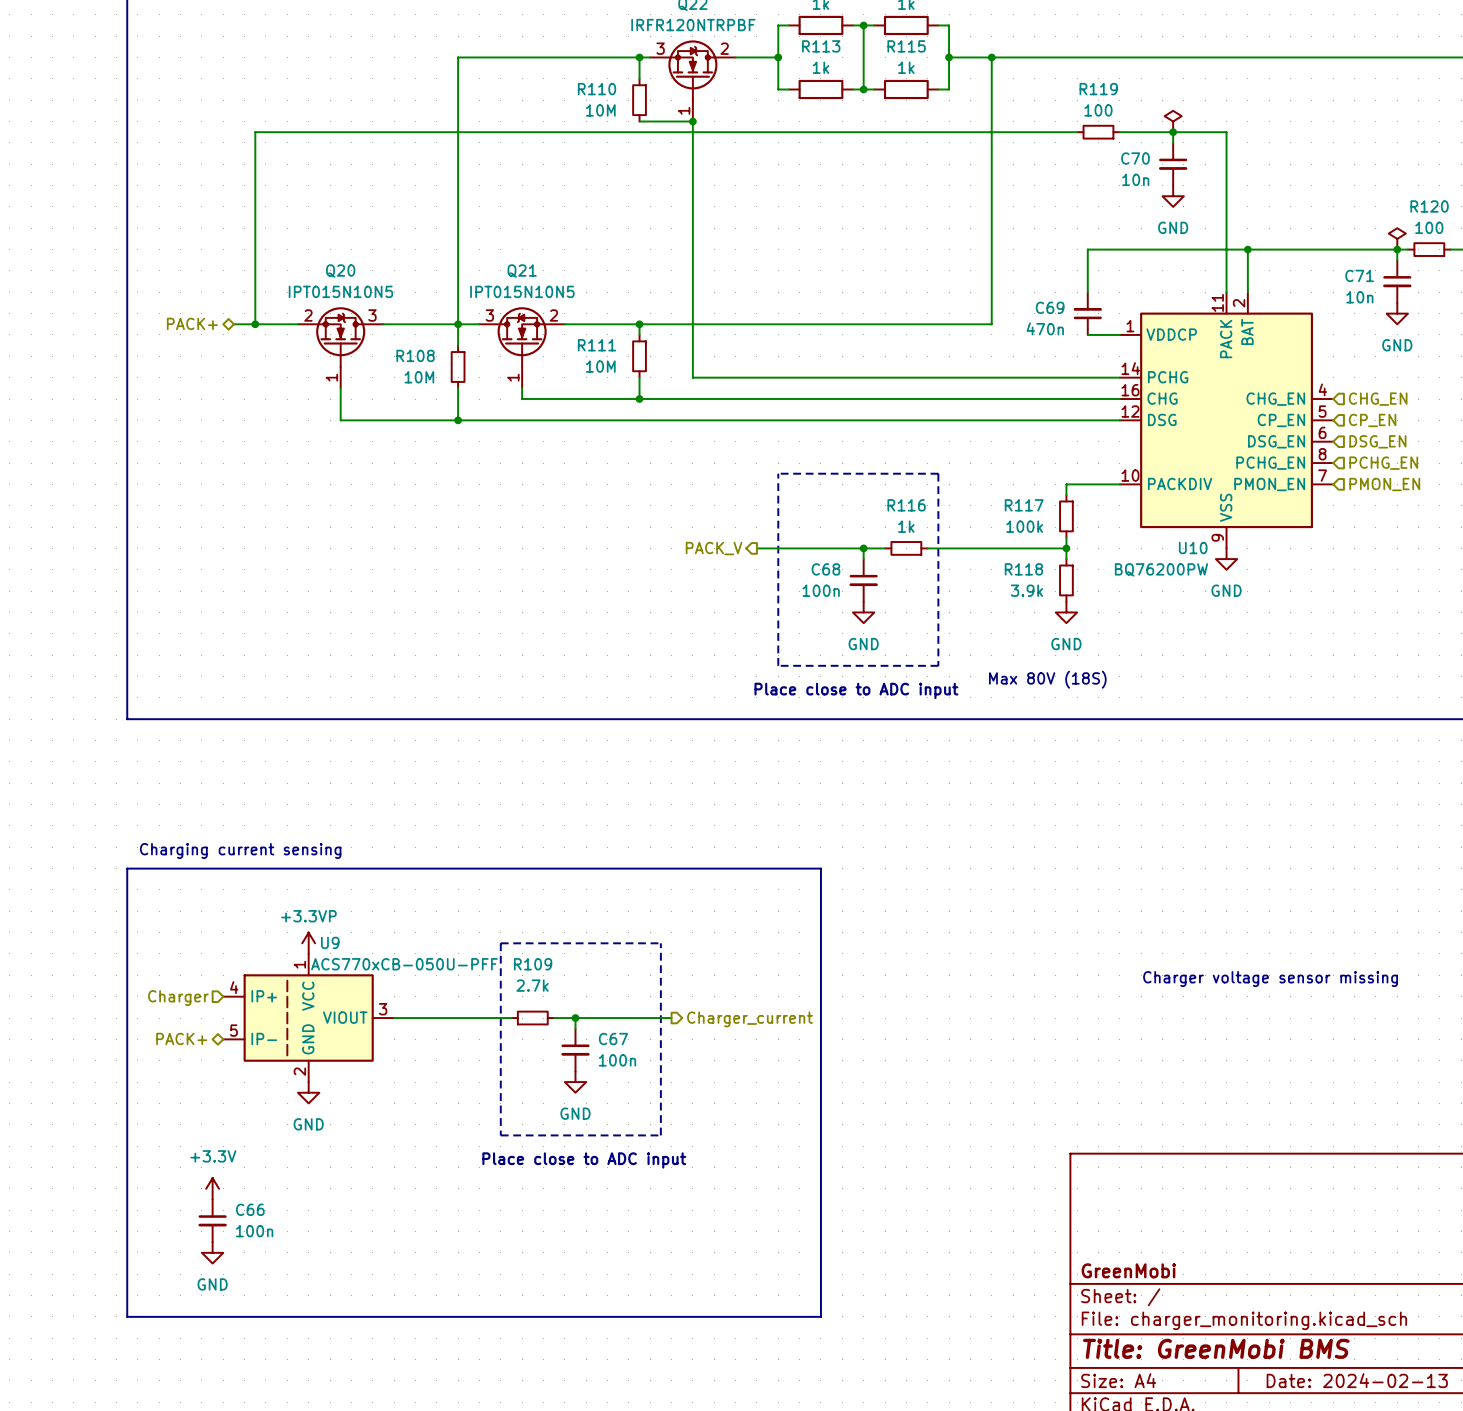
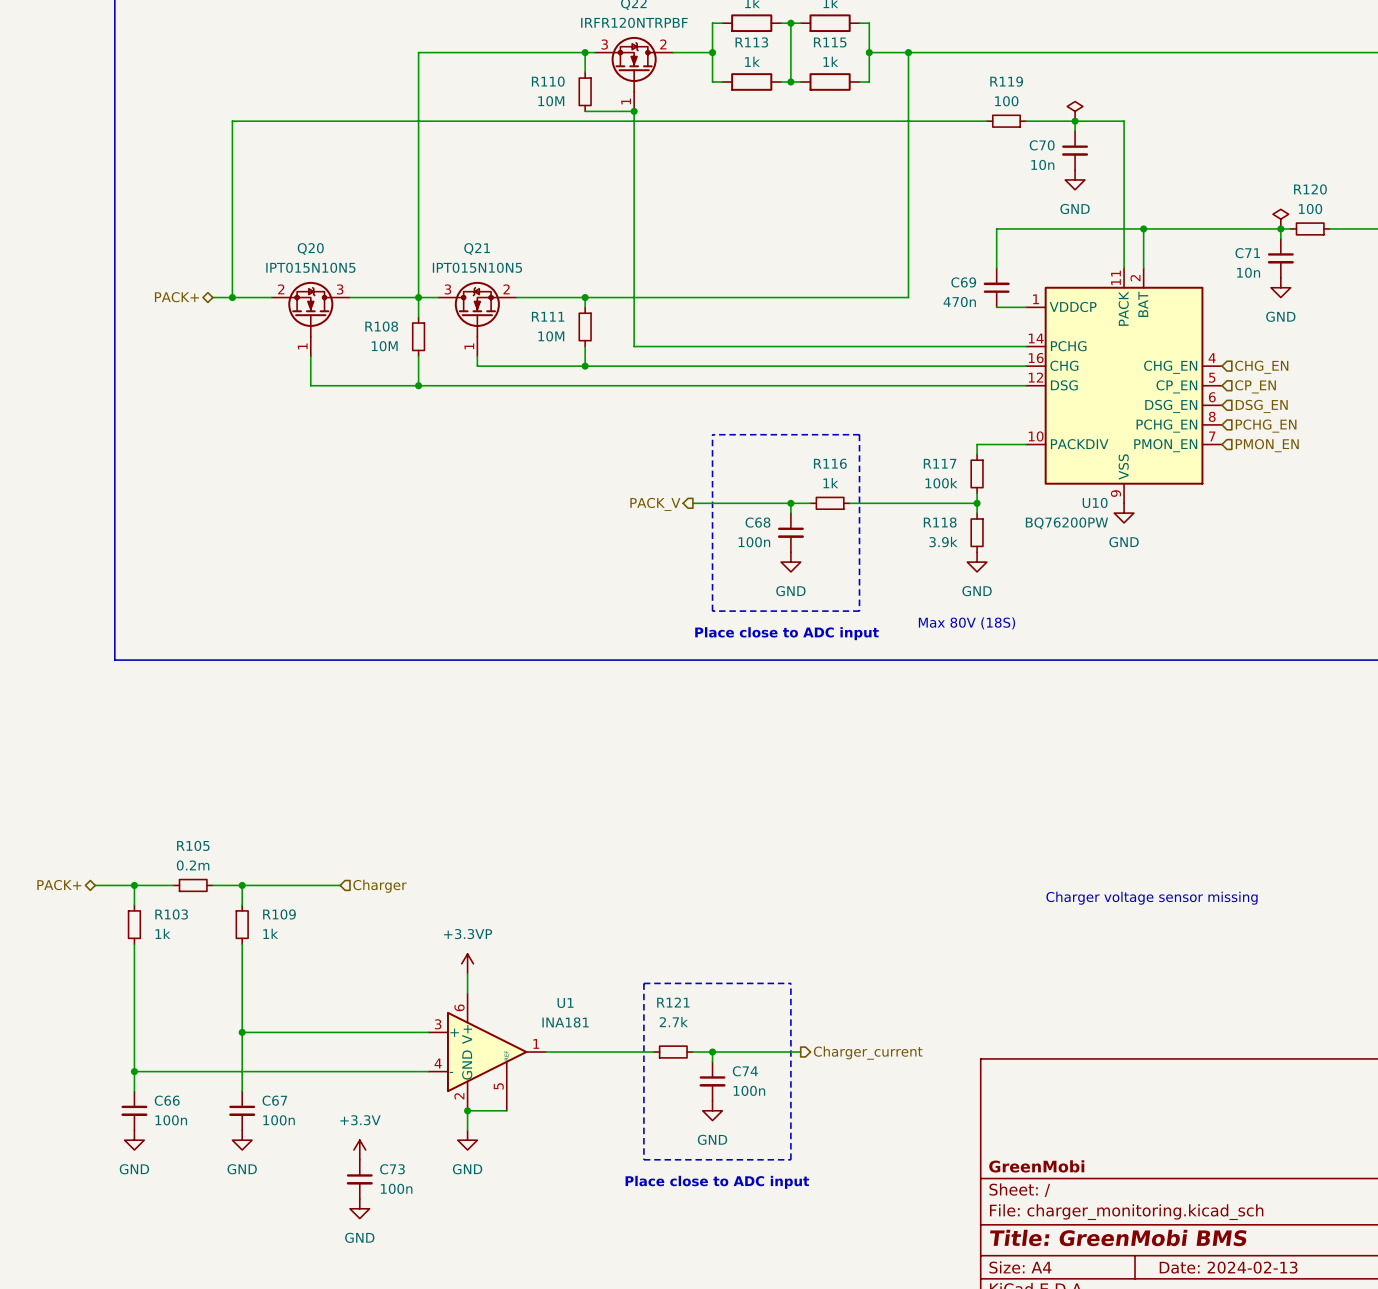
text: Charging current sensing (240, 850) -> none
line: (127, 868) (820, 868) (820, 1316) (127, 1316) (127, 868) -> none
power symbol: +3.3VP (308, 943) -> none
line: (500, 943) (660, 943) (660, 1135) (500, 1135) (500, 943) -> none
wire: none -> (95, 885) (173, 885)
wire: none -> (134, 885) (134, 905)
junction: none -> (134, 885)
R105: none -> 0.2m (193, 885)
wire: none -> (212, 885) (340, 885)
junction: none -> (242, 885)
R109 value: 2.7k (532, 985) -> 1k (270, 933)
hierarchical label rotation: 0° (178, 998) -> 180° (380, 886)
hierarchical label position: Charger (178, 998) -> Charger (380, 886)
R103: none -> 1k (134, 924)
U9: ACS770xCB-050U-PFF (308, 1018) -> none
wire: (394, 1018) (511, 1018) -> none
R109 rotation: 0° (532, 1018) -> 90° clockwise (242, 924)
R109 position: (532, 1018) -> (242, 924)
wire: (554, 1018) (671, 1018) -> (545, 1052) (653, 1052)
wire: (575, 1018) (575, 1028) -> none
junction: (575, 1018) -> none
hierarchical label: Charger_current (749, 1019) -> none
wire: none -> (134, 944) (134, 1091)
wire: none -> (242, 944) (242, 1091)
hierarchical label position: PACK+ (181, 1038) -> PACK+ (59, 885)
power symbol: none -> +3.3VP (467, 963)
C67 position: (575, 1050) -> (242, 1110)
wire: none -> (467, 973) (467, 993)
line: none -> (643, 983) (643, 1159) (790, 1159) (790, 983) (643, 983)
power symbol: GND (575, 1082) -> none
power symbol: GND (308, 1092) -> none
wire: none -> (242, 1032) (428, 1032)
junction: none -> (242, 1032)
U1: none -> INA181 (487, 1052)
R121: none -> 2.7k (673, 1052)
wire: none -> (692, 1052) (800, 1052)
wire: none -> (712, 1052) (712, 1061)
junction: none -> (712, 1052)
hierarchical label: none -> Charger_current (868, 1053)
text: Place close to ADC input (584, 1160) -> none
wire: none -> (134, 1071) (428, 1071)
junction: none -> (134, 1071)
C74: none -> 100n (712, 1081)
power symbol position: +3.3V (212, 1188) -> +3.3V (359, 1149)
junction: none -> (467, 1110)
wire: none -> (506, 1110) (467, 1110) (467, 1130)
power symbol: none -> GND (712, 1110)
C66 position: (212, 1220) -> (134, 1110)
power symbol: none -> GND (134, 1140)
power symbol: none -> GND (242, 1140)
power symbol: none -> GND (467, 1140)
power symbol: GND (212, 1252) -> none
C73: none -> 100n (359, 1179)
text: none -> Place close to ADC input (717, 1182)
power symbol: none -> GND (359, 1208)

